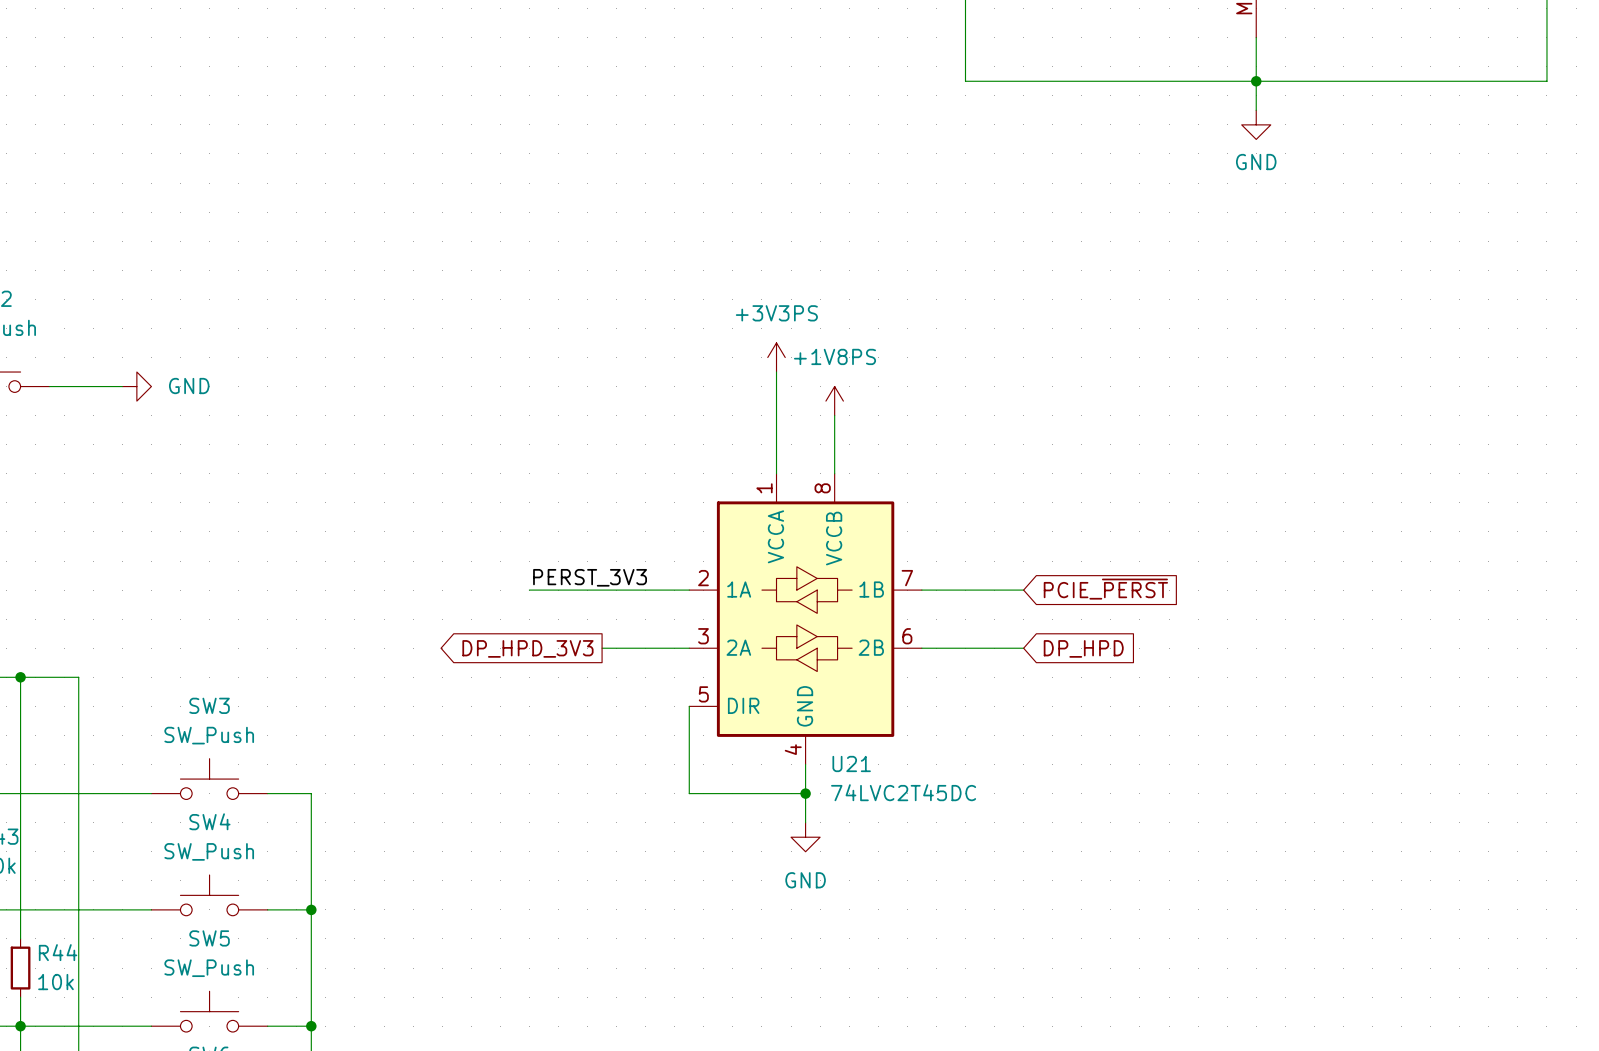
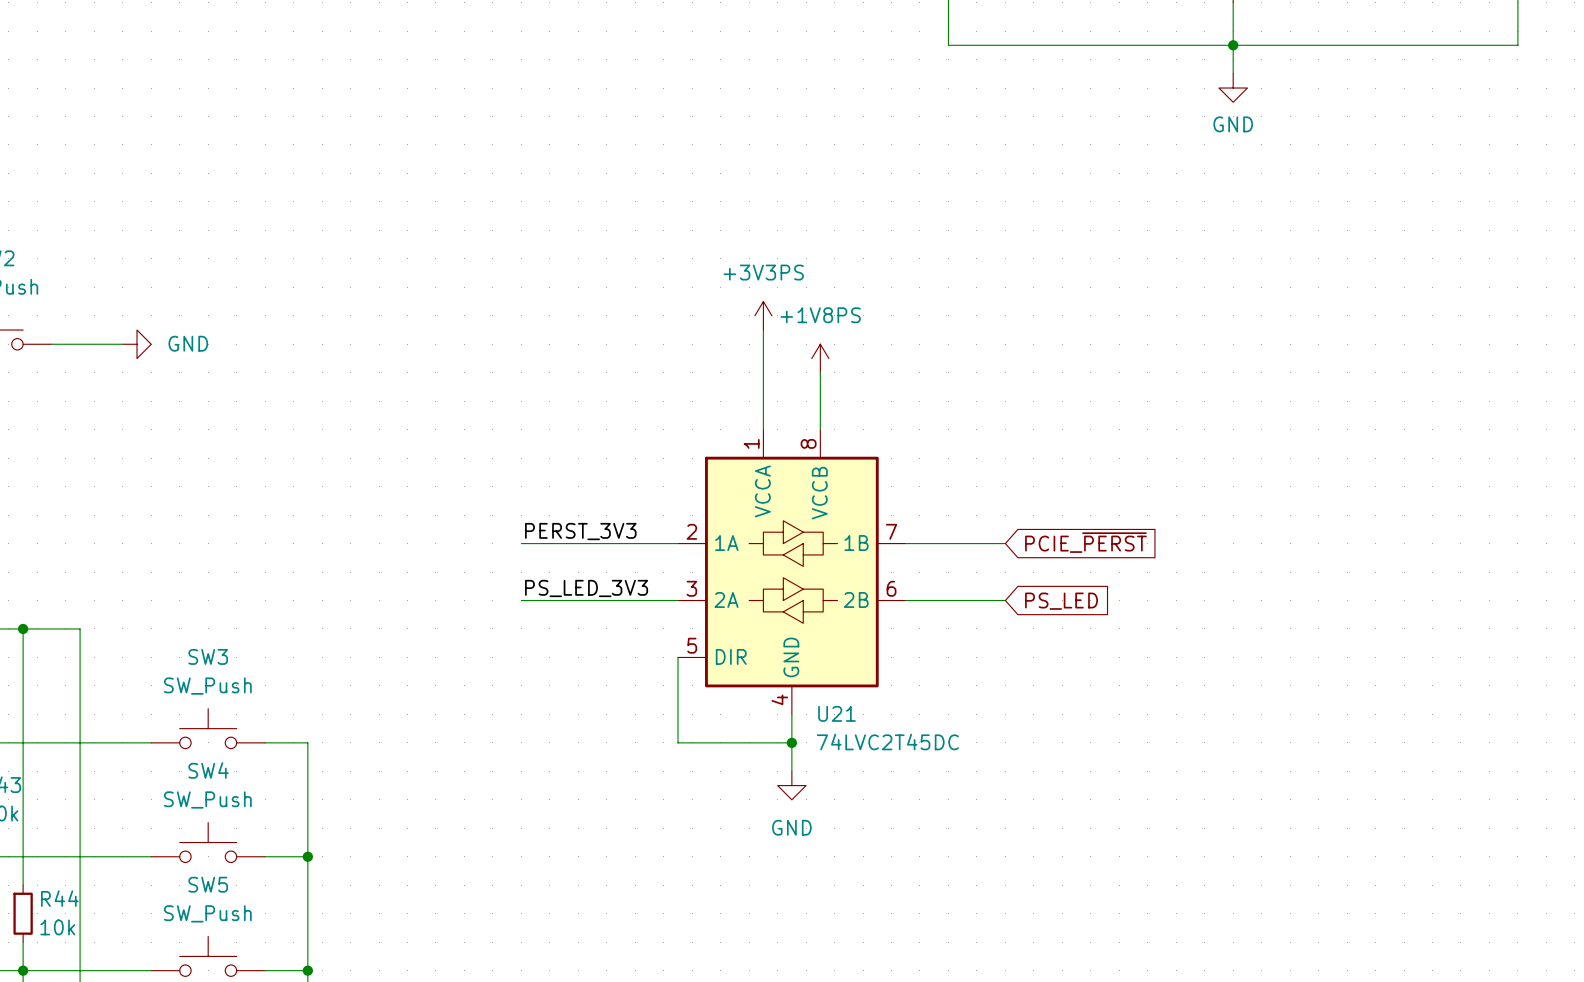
label: none -> PS_LED_3V3 (586, 588)
global label: DP_HPD_3V3 (527, 648) -> none
wire: none -> (521, 600) (592, 600)
global label: DP_HPD (1083, 648) -> PS_LED (1061, 601)

